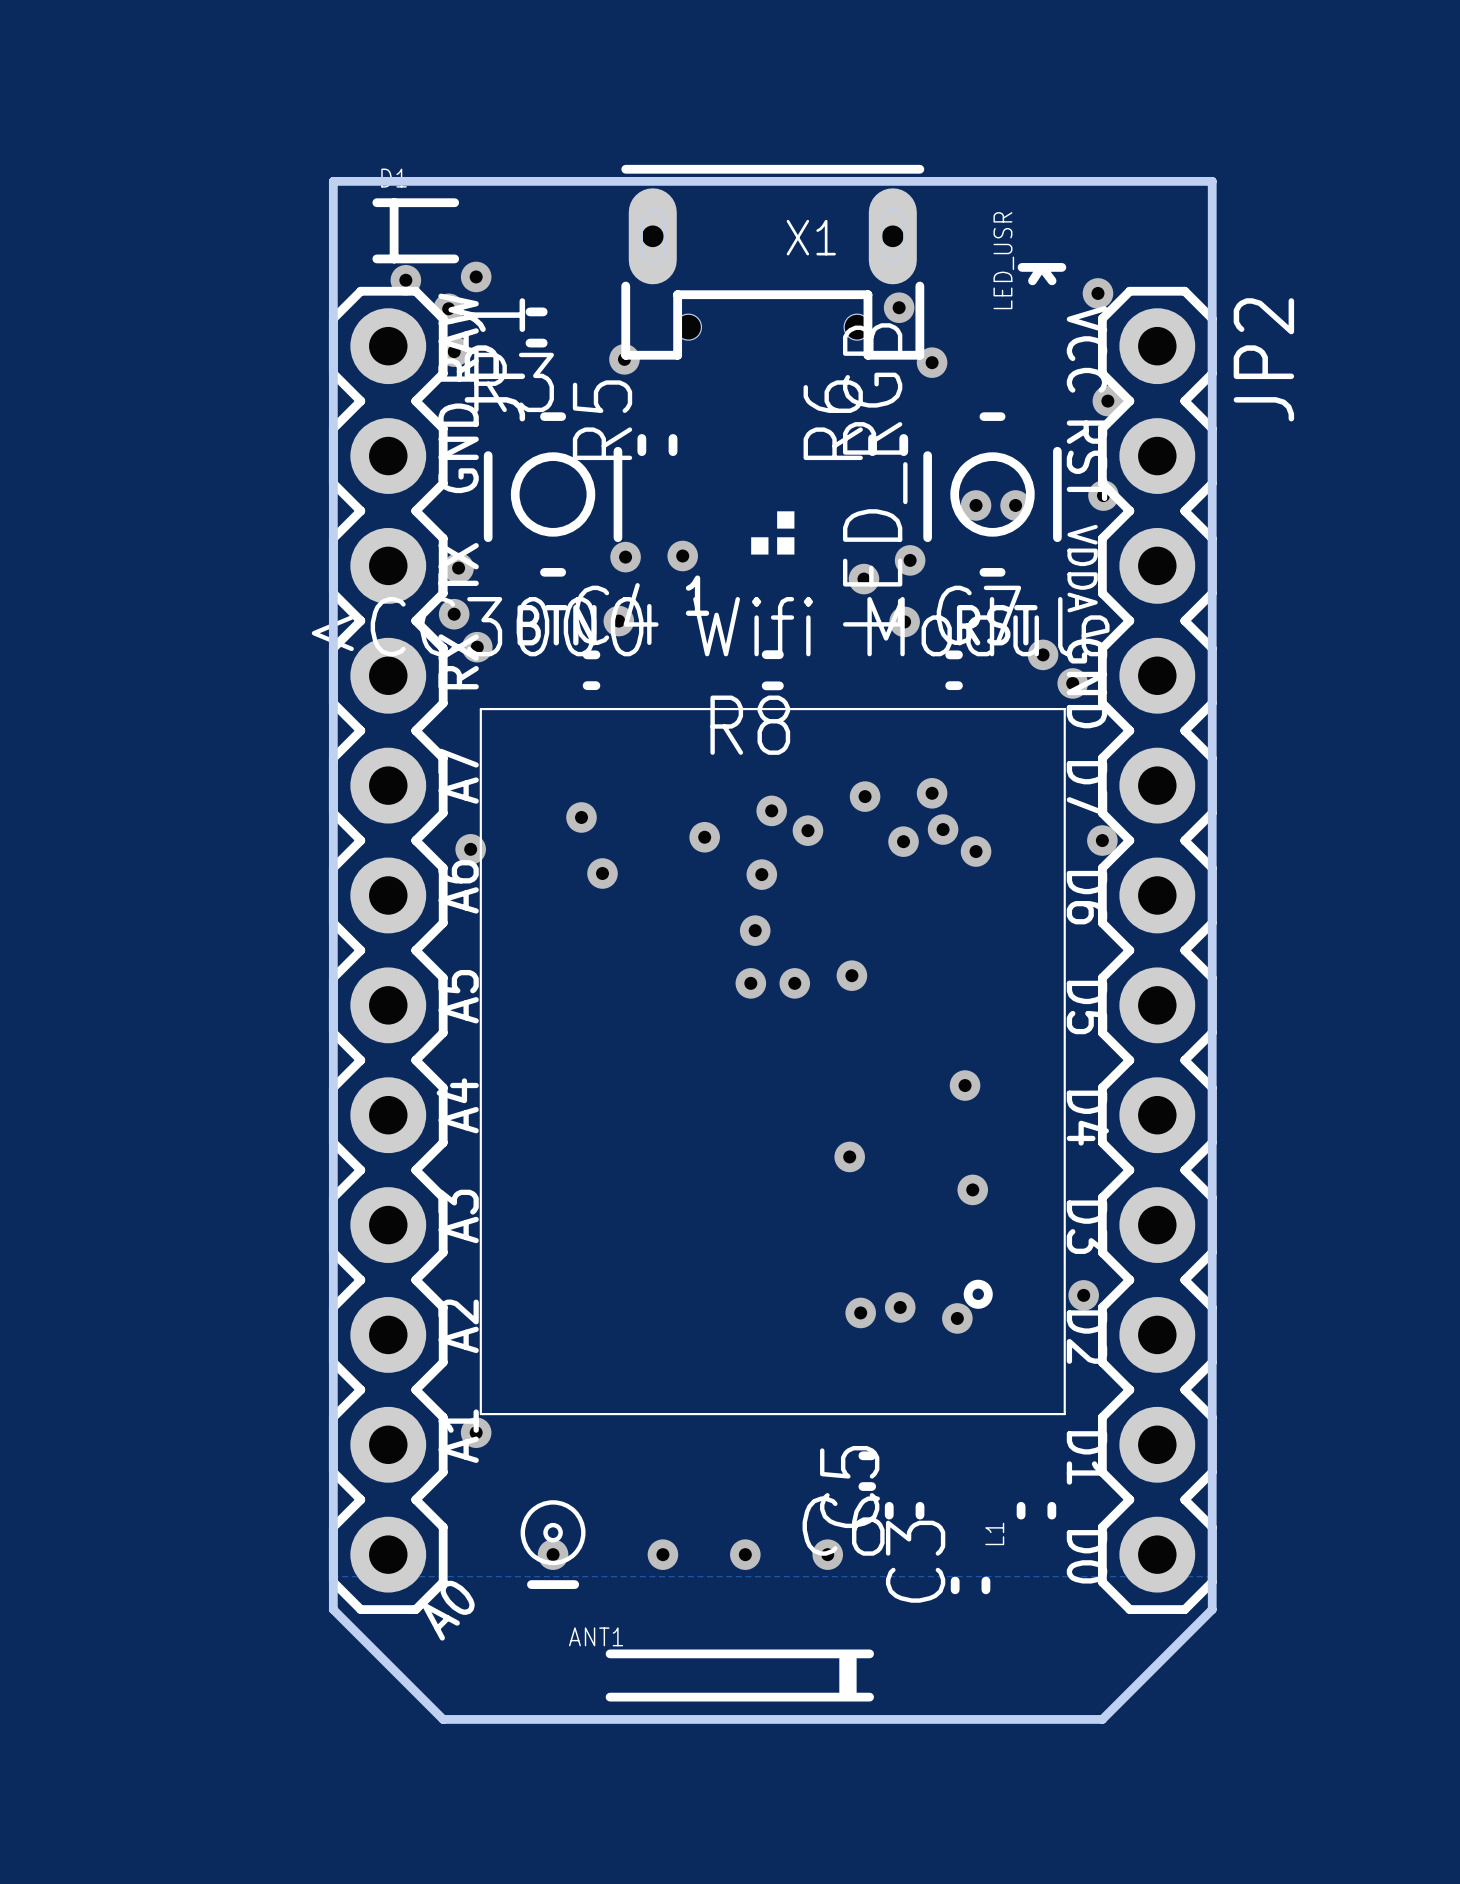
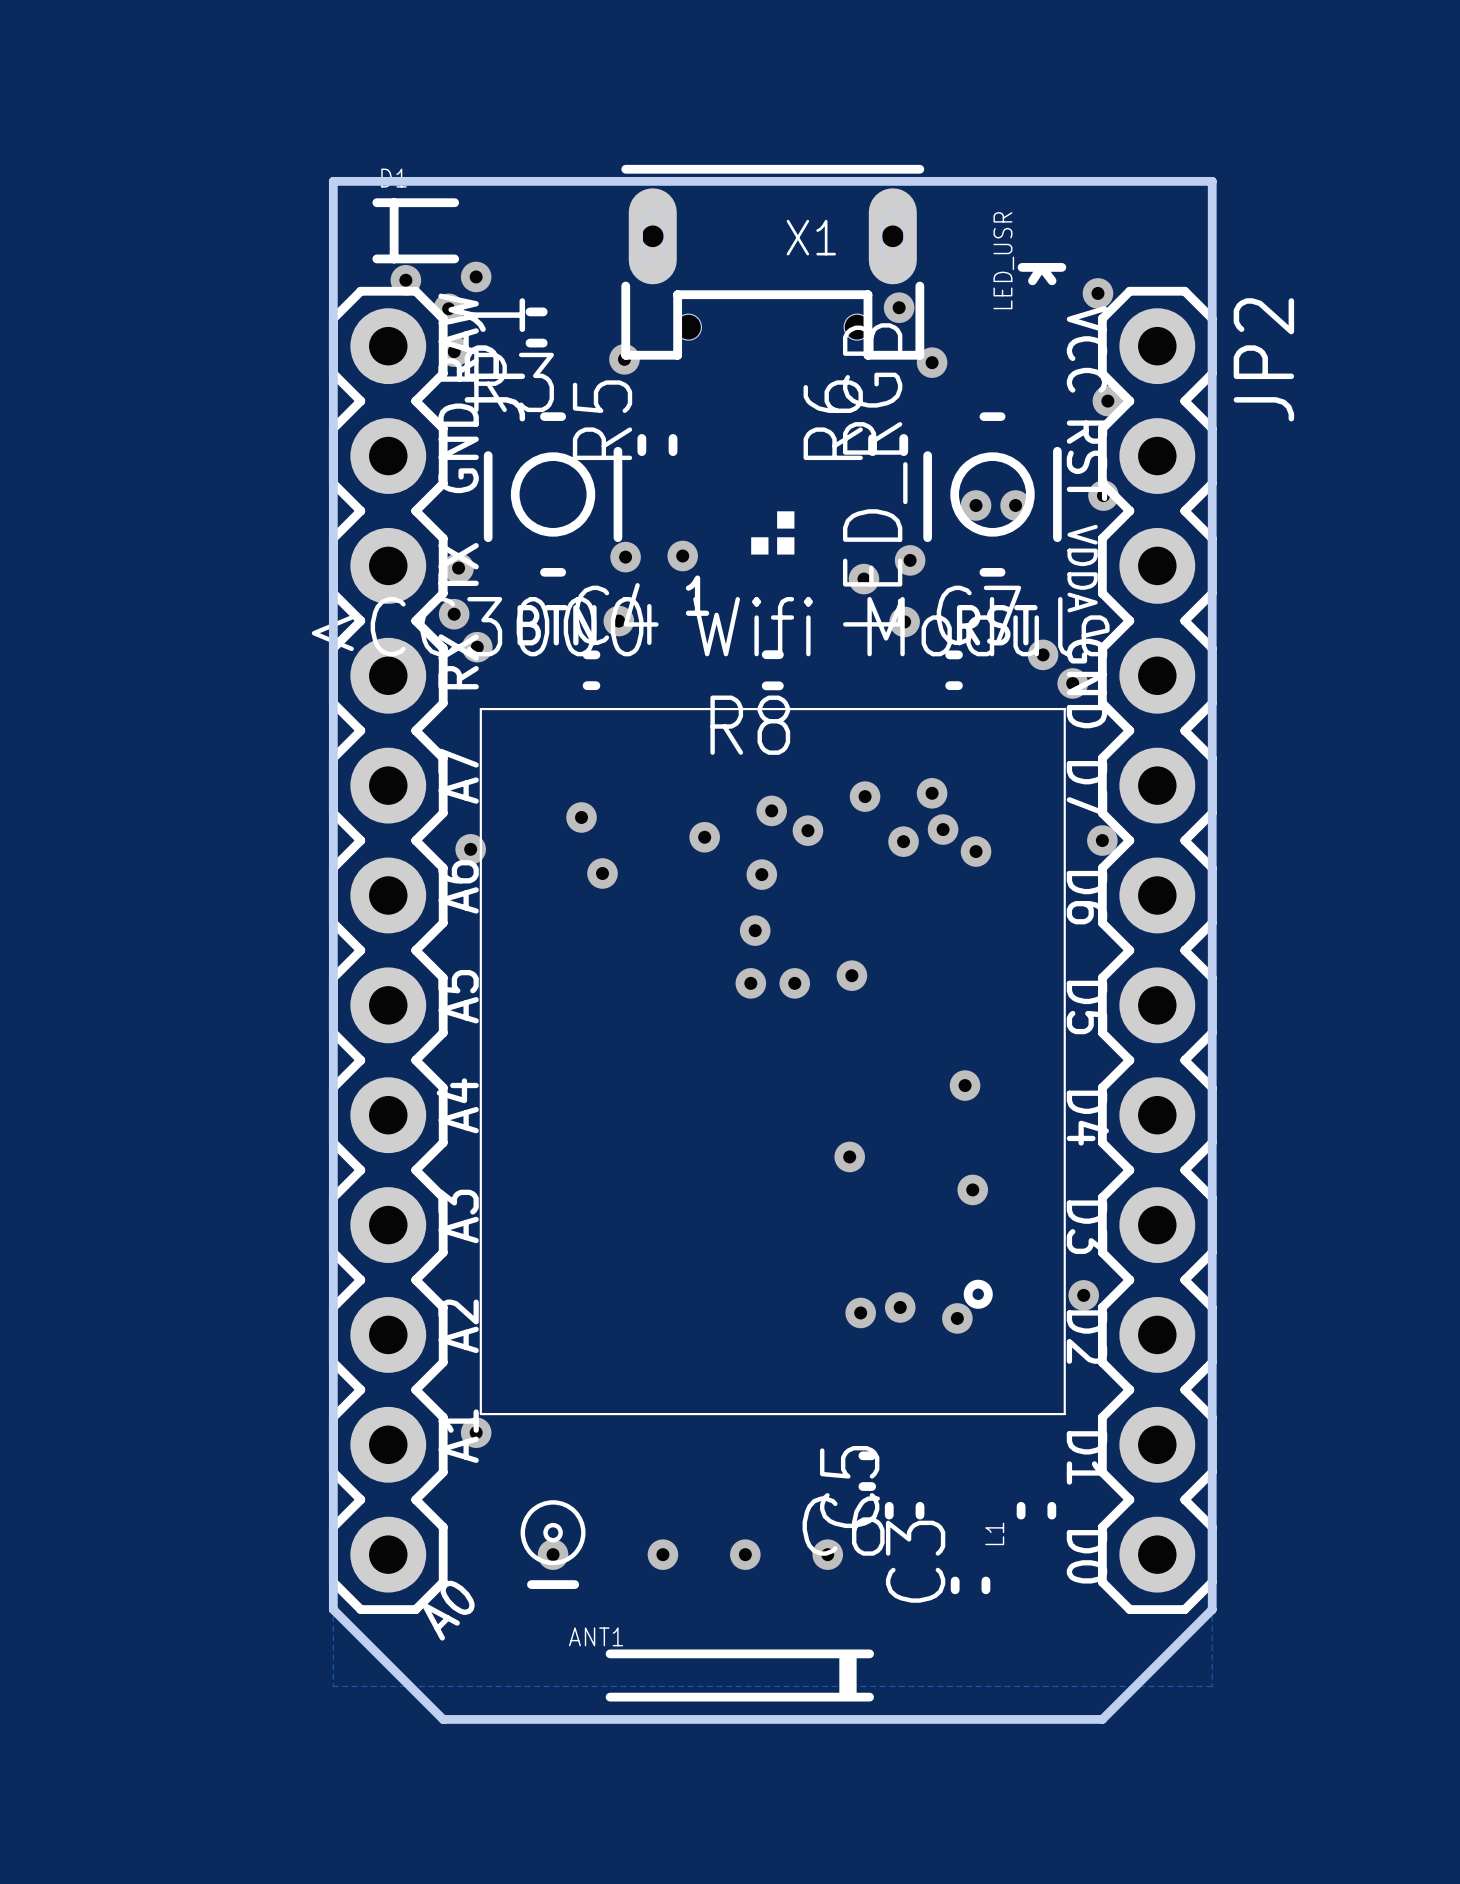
zone outline: (333, 1576) (1212, 1576) -> (333, 1576) (333, 1686) (1212, 1686) (1212, 1576)

